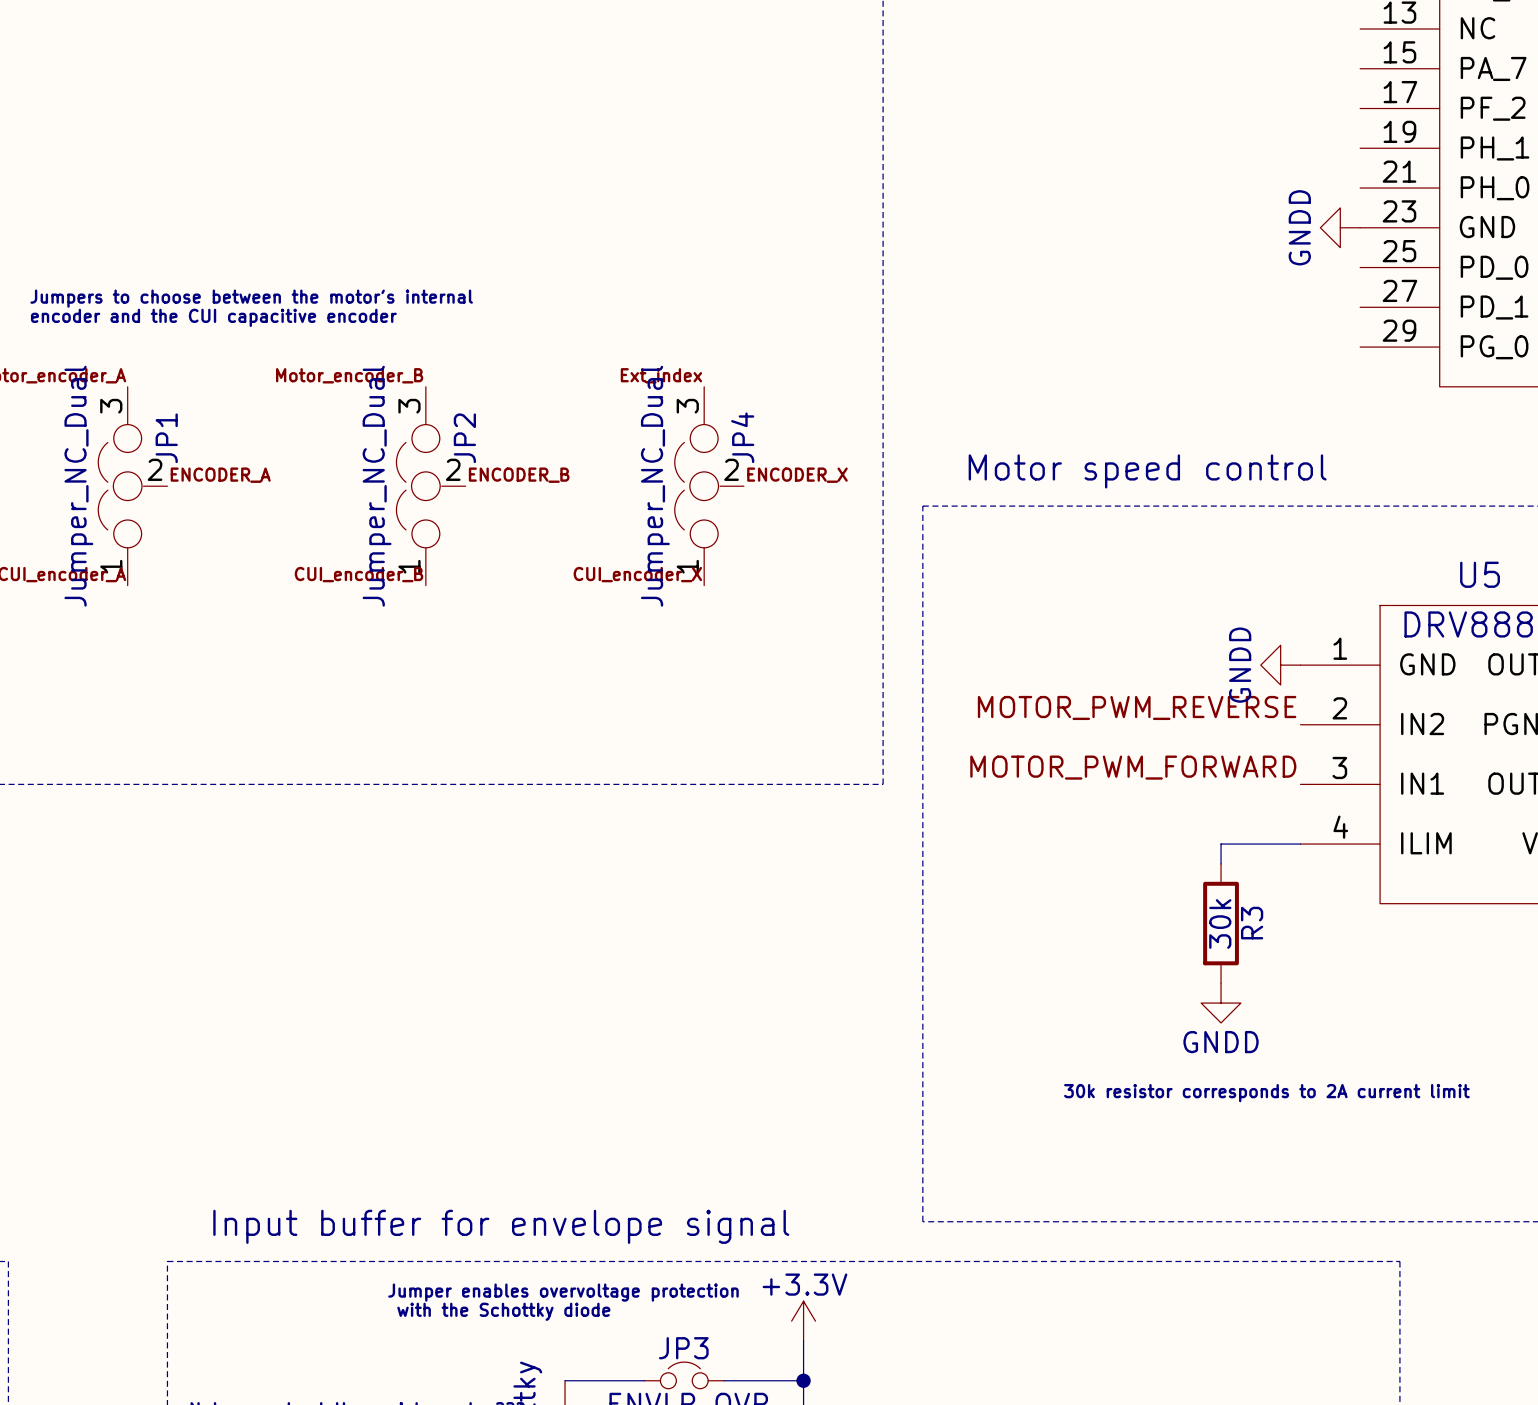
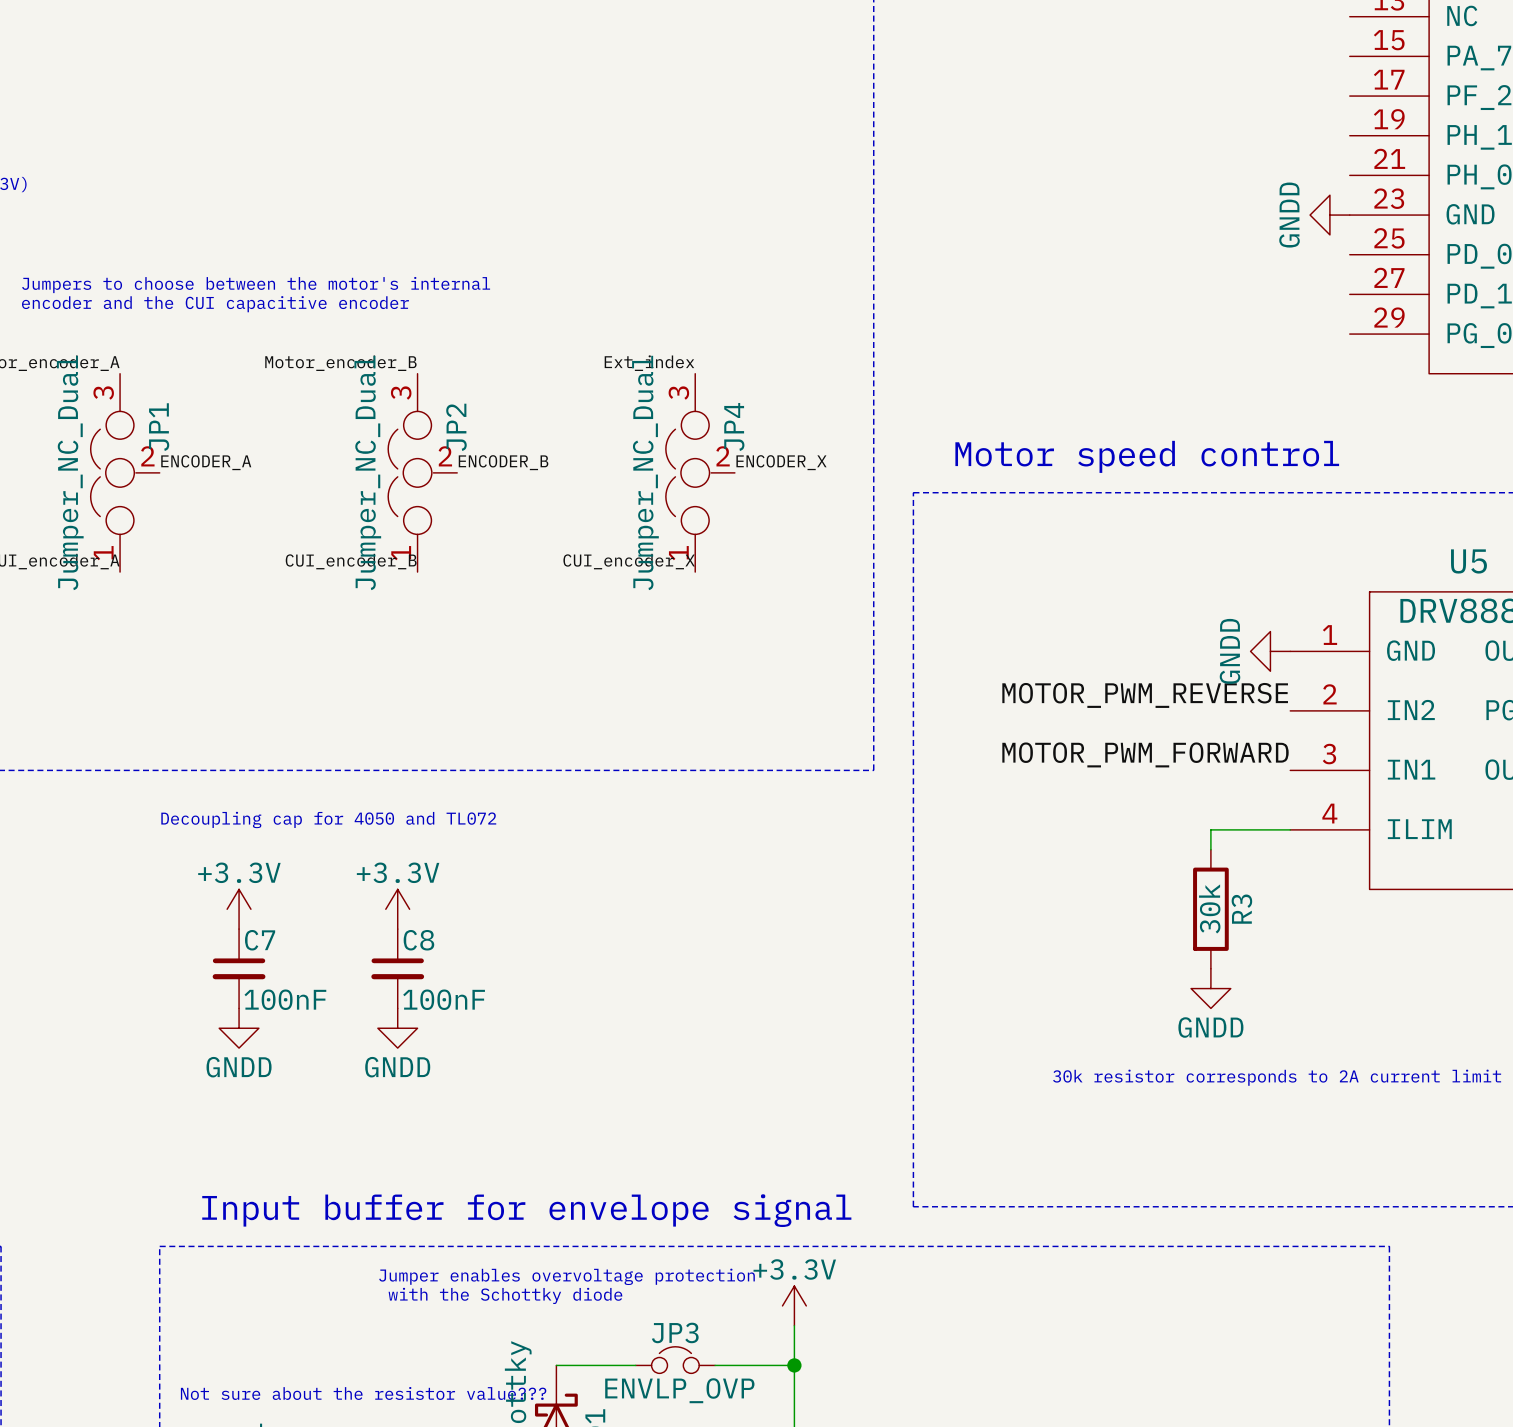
text: none -> Decoupling cap for 4050 and TL072 (328, 819)
power symbol: none -> +3.3V (239, 909)
power symbol: none -> +3.3V (397, 909)
C7: none -> 100nF (239, 968)
C8: none -> 100nF (397, 968)
power symbol: none -> GNDD (239, 1028)
power symbol: none -> GNDD (397, 1028)

